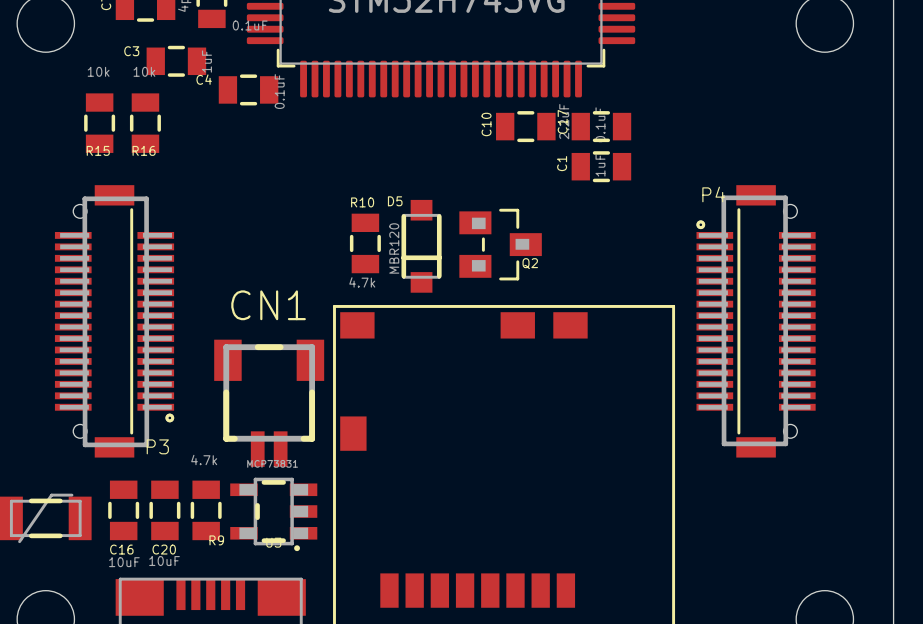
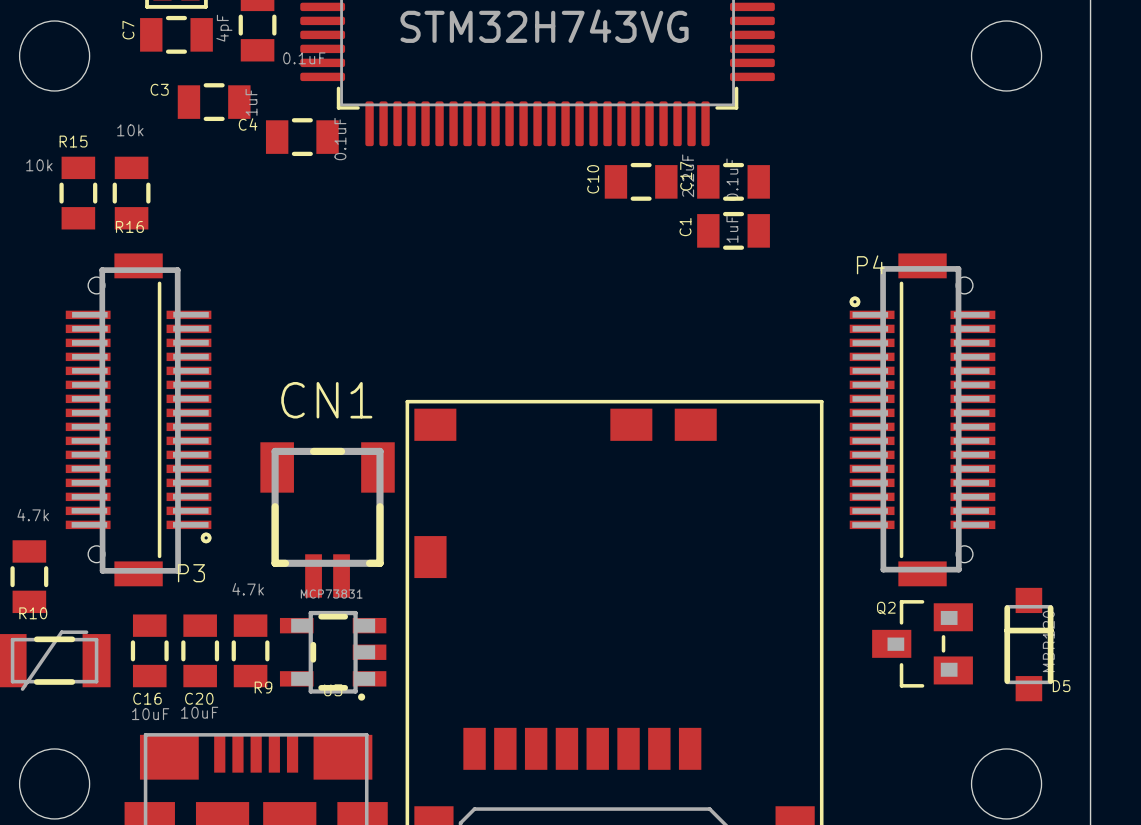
R15 value position: 10k (98, 71) -> 10k (39, 165)
R15 position: (99, 123) -> (78, 193)
R16 position: (145, 123) -> (131, 193)
R15 name position: R15 (98, 150) -> R15 (73, 141)
R10 name position: R10 (362, 202) -> R10 (33, 613)
R10 position: (365, 243) -> (29, 576)
Q2 rotation: 0° (500, 244) -> 180° (922, 643)
Q2 position: (500, 244) -> (922, 643)
D5 rotation: 0° (421, 246) -> 180° (1028, 644)
D5 position: (421, 246) -> (1028, 644)
R10 value position: 4.7k (362, 282) -> 4.7k (33, 515)

